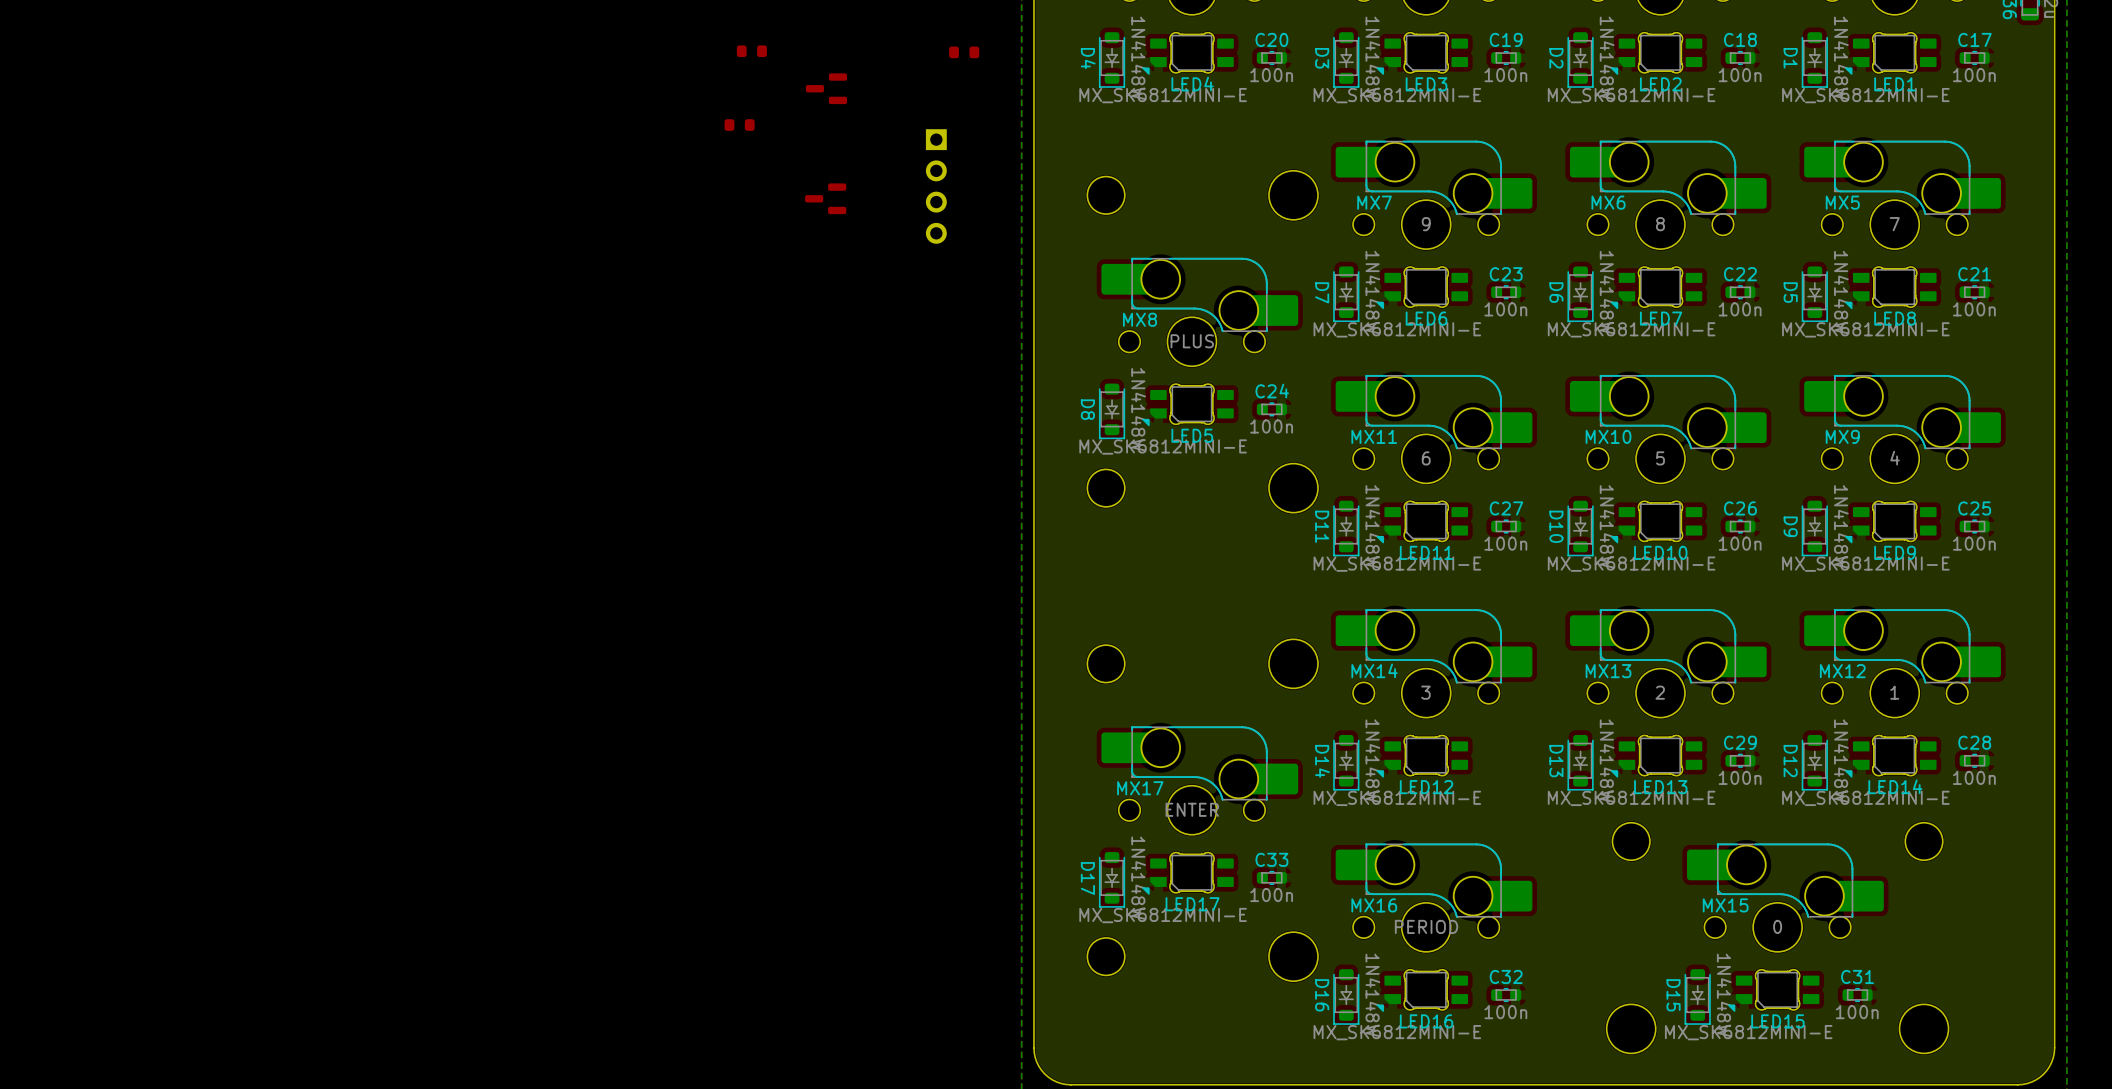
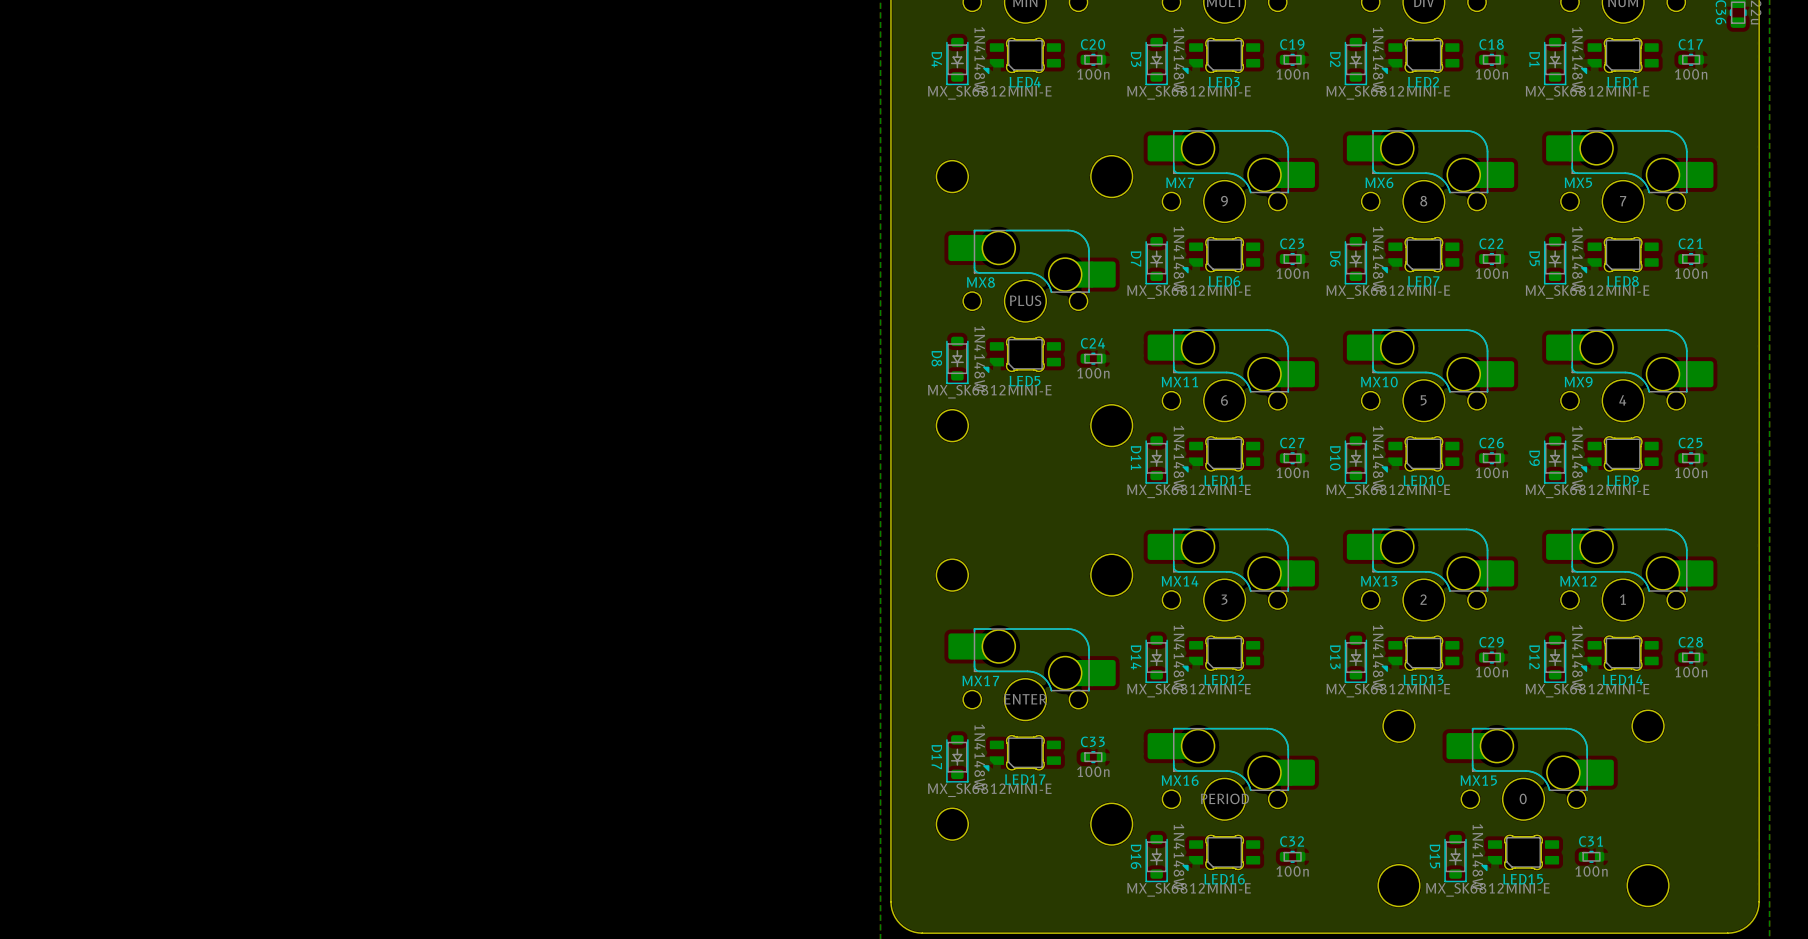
part: (751, 51) -> none
part: (964, 52) -> none
part: (826, 88) -> none
part: (739, 125) -> none
part: (936, 186) -> none
part: (825, 198) -> none

